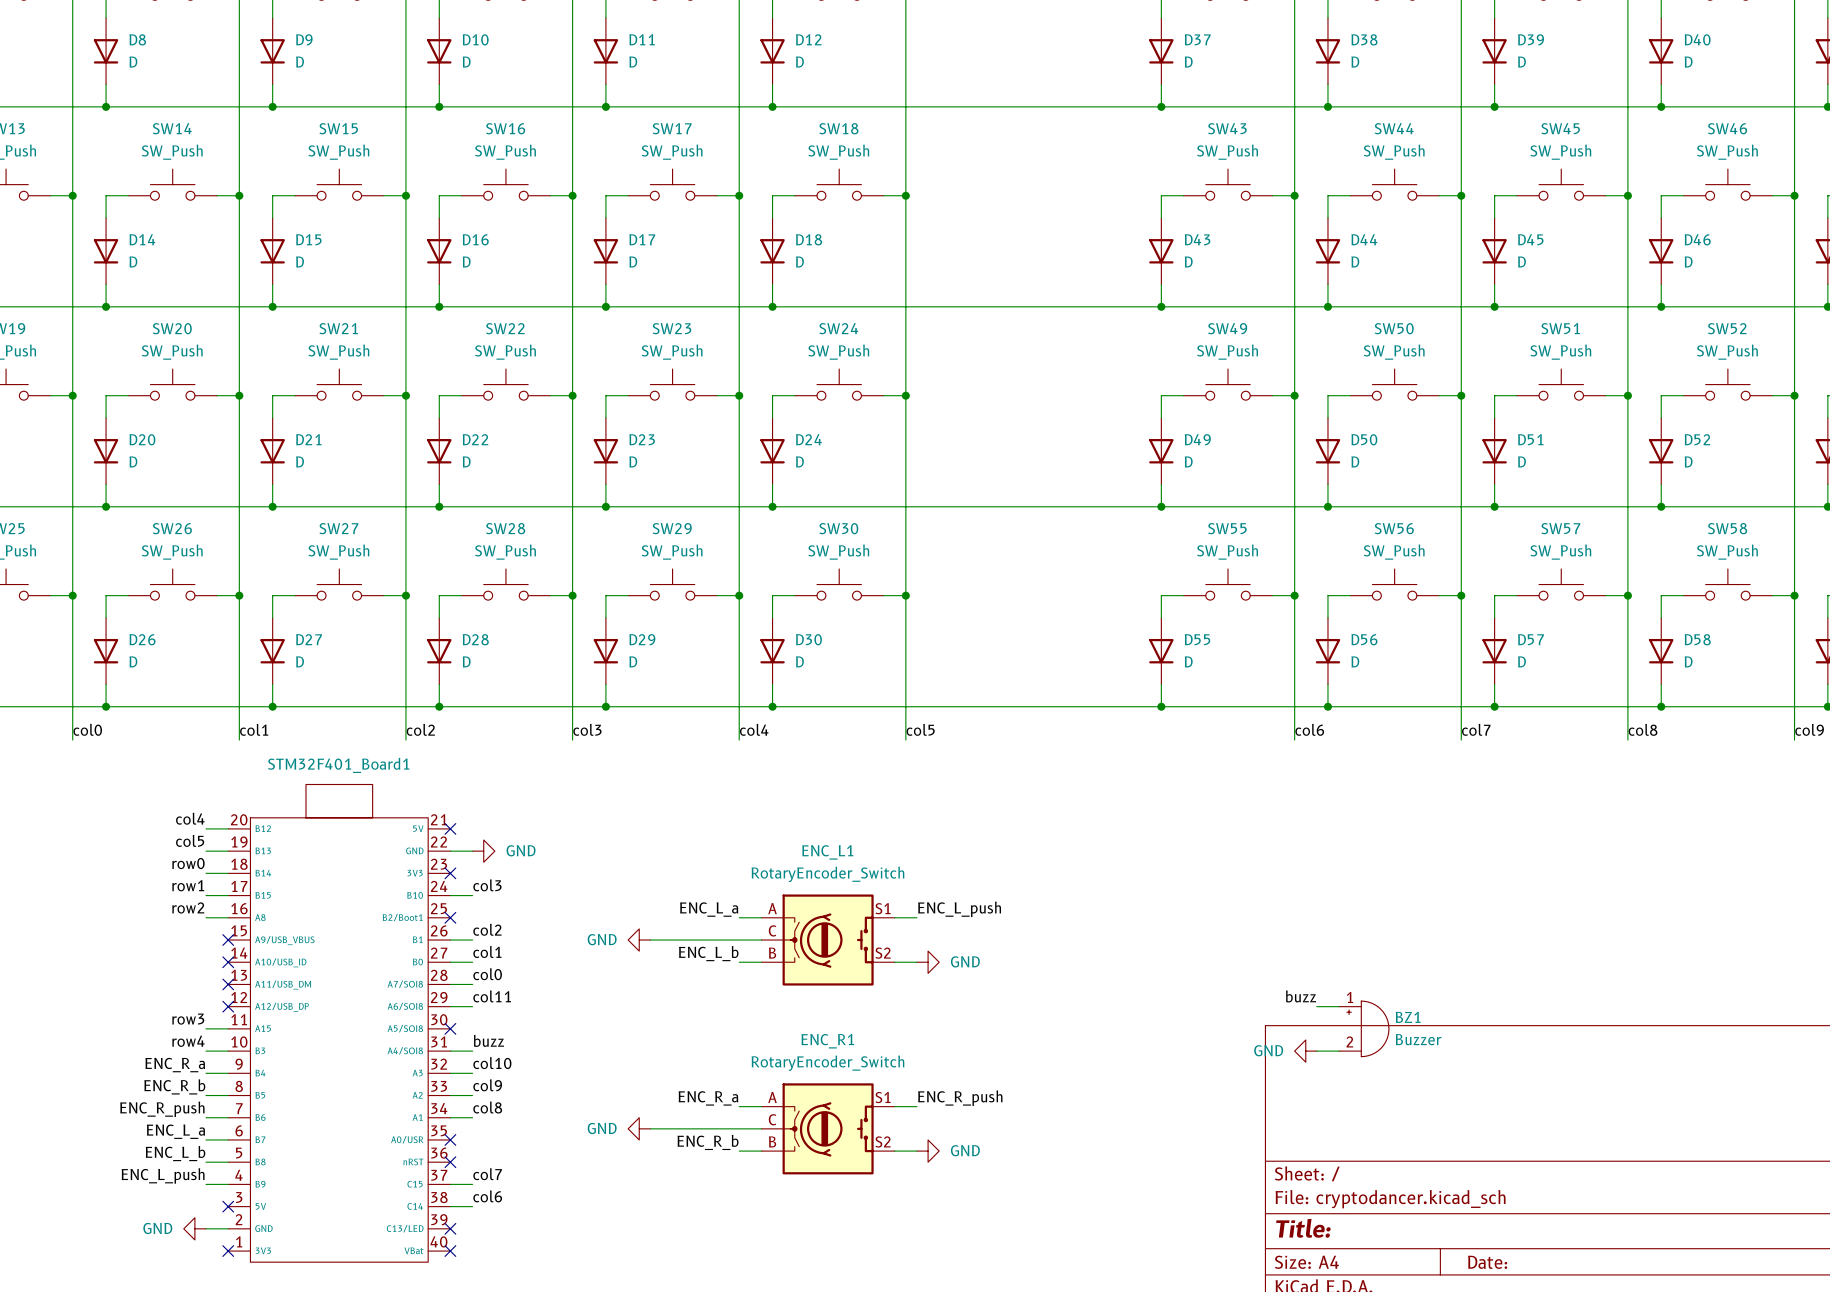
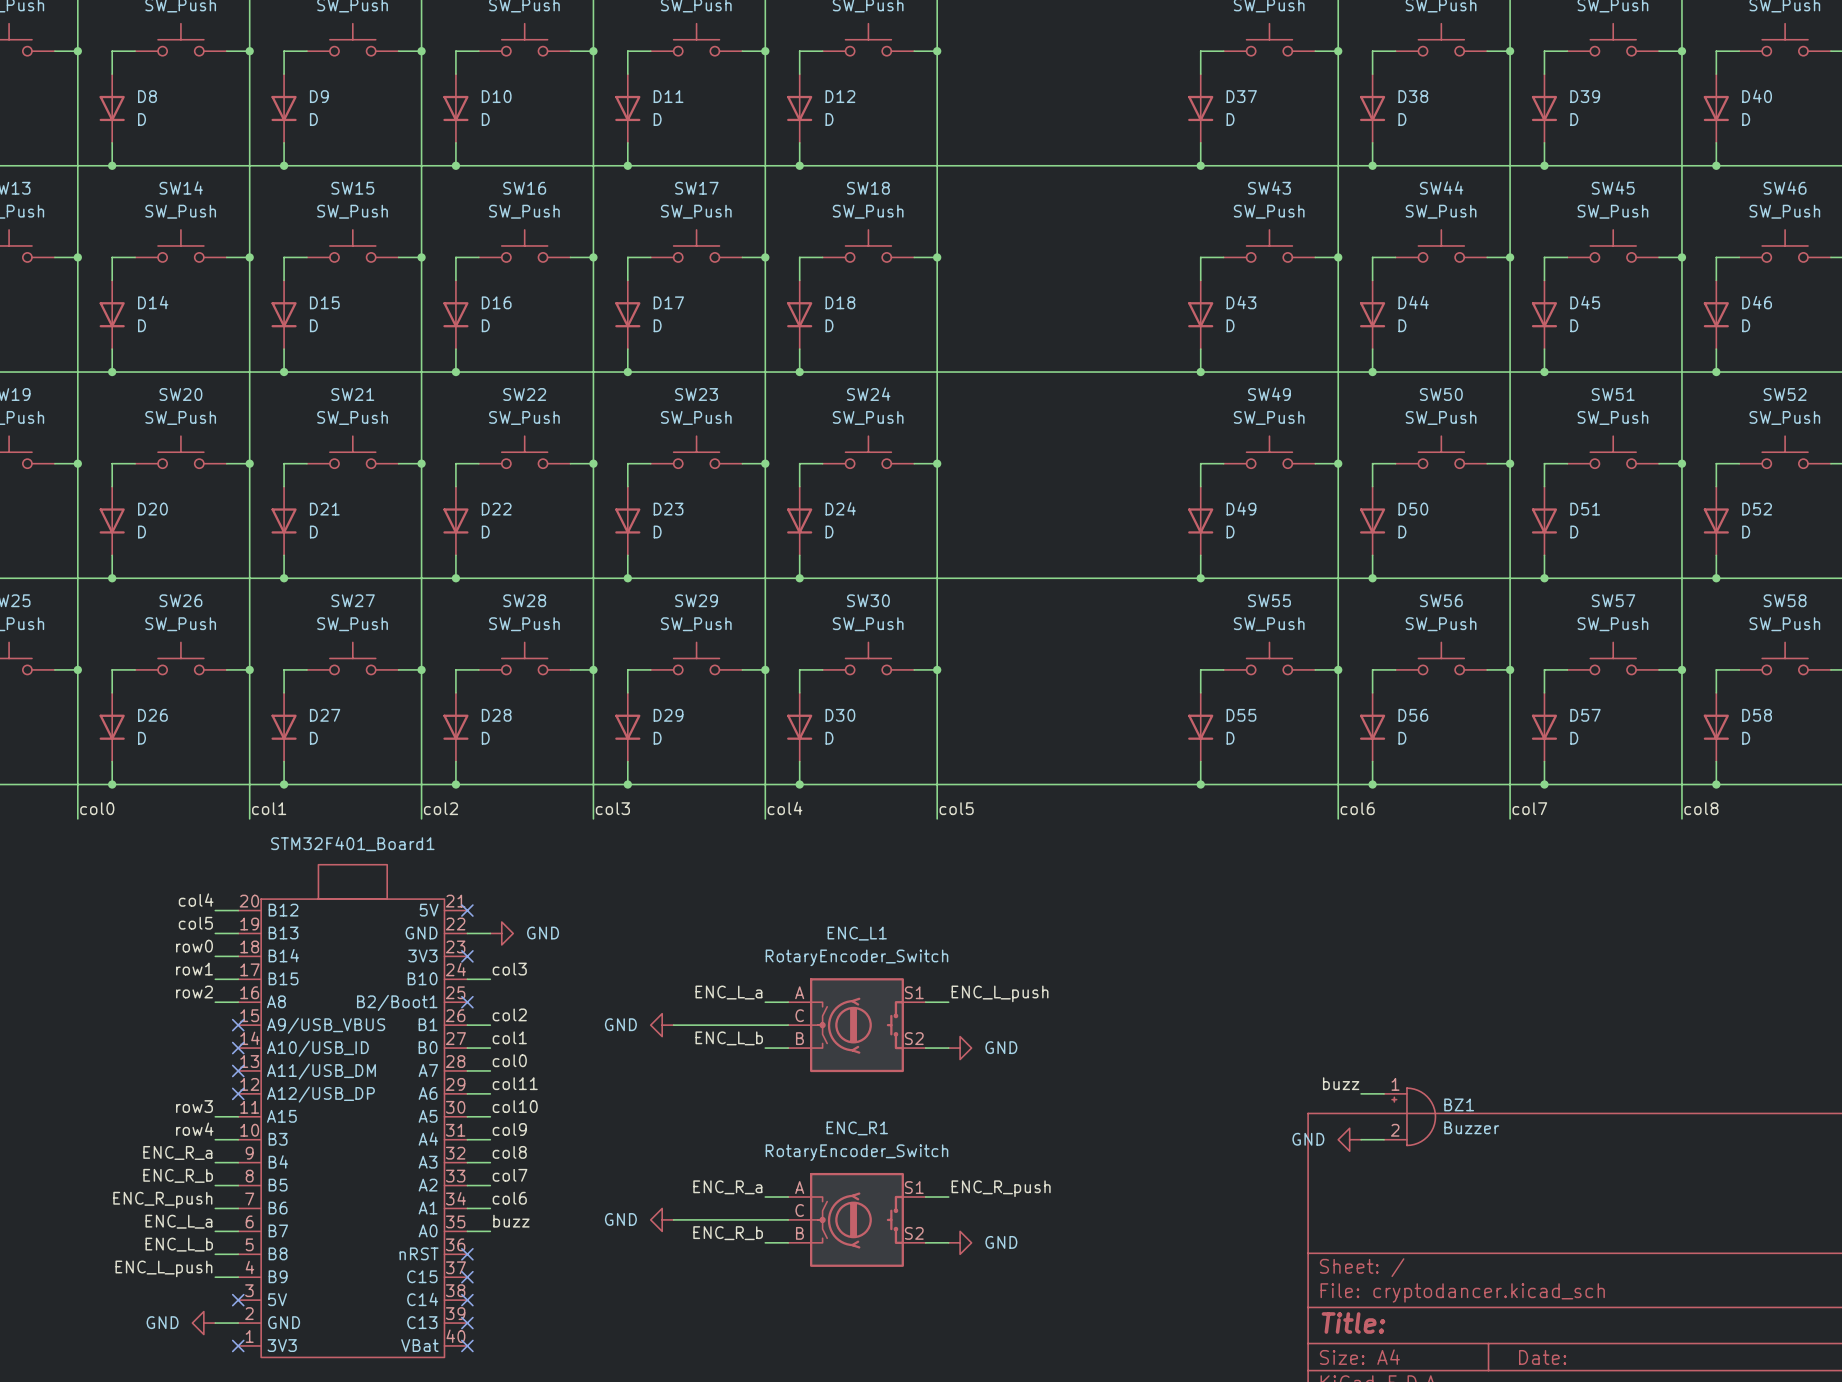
STM32F401_Board1 symbol: [228, 784, 451, 1263] -> [238, 864, 468, 1358]
label: none -> col10 (515, 1106)
no-connect mark: (450, 1028) -> none
label: buzz (488, 1040) -> col9 (509, 1129)
label: col10 (492, 1063) -> col8 (509, 1152)
label: col9 (487, 1085) -> col7 (510, 1175)
label: col8 (487, 1107) -> col6 (509, 1198)
label: none -> buzz (511, 1221)
no-connect mark: (450, 1139) -> none
label: col7 (487, 1174) -> none
wire: (450, 1184) (472, 1184) -> (467, 1231) (490, 1231)
no-connect mark: none -> (467, 1277)
label: col6 (487, 1196) -> none
wire: (450, 1206) (472, 1206) -> (467, 1116) (490, 1116)
no-connect mark: none -> (467, 1300)

